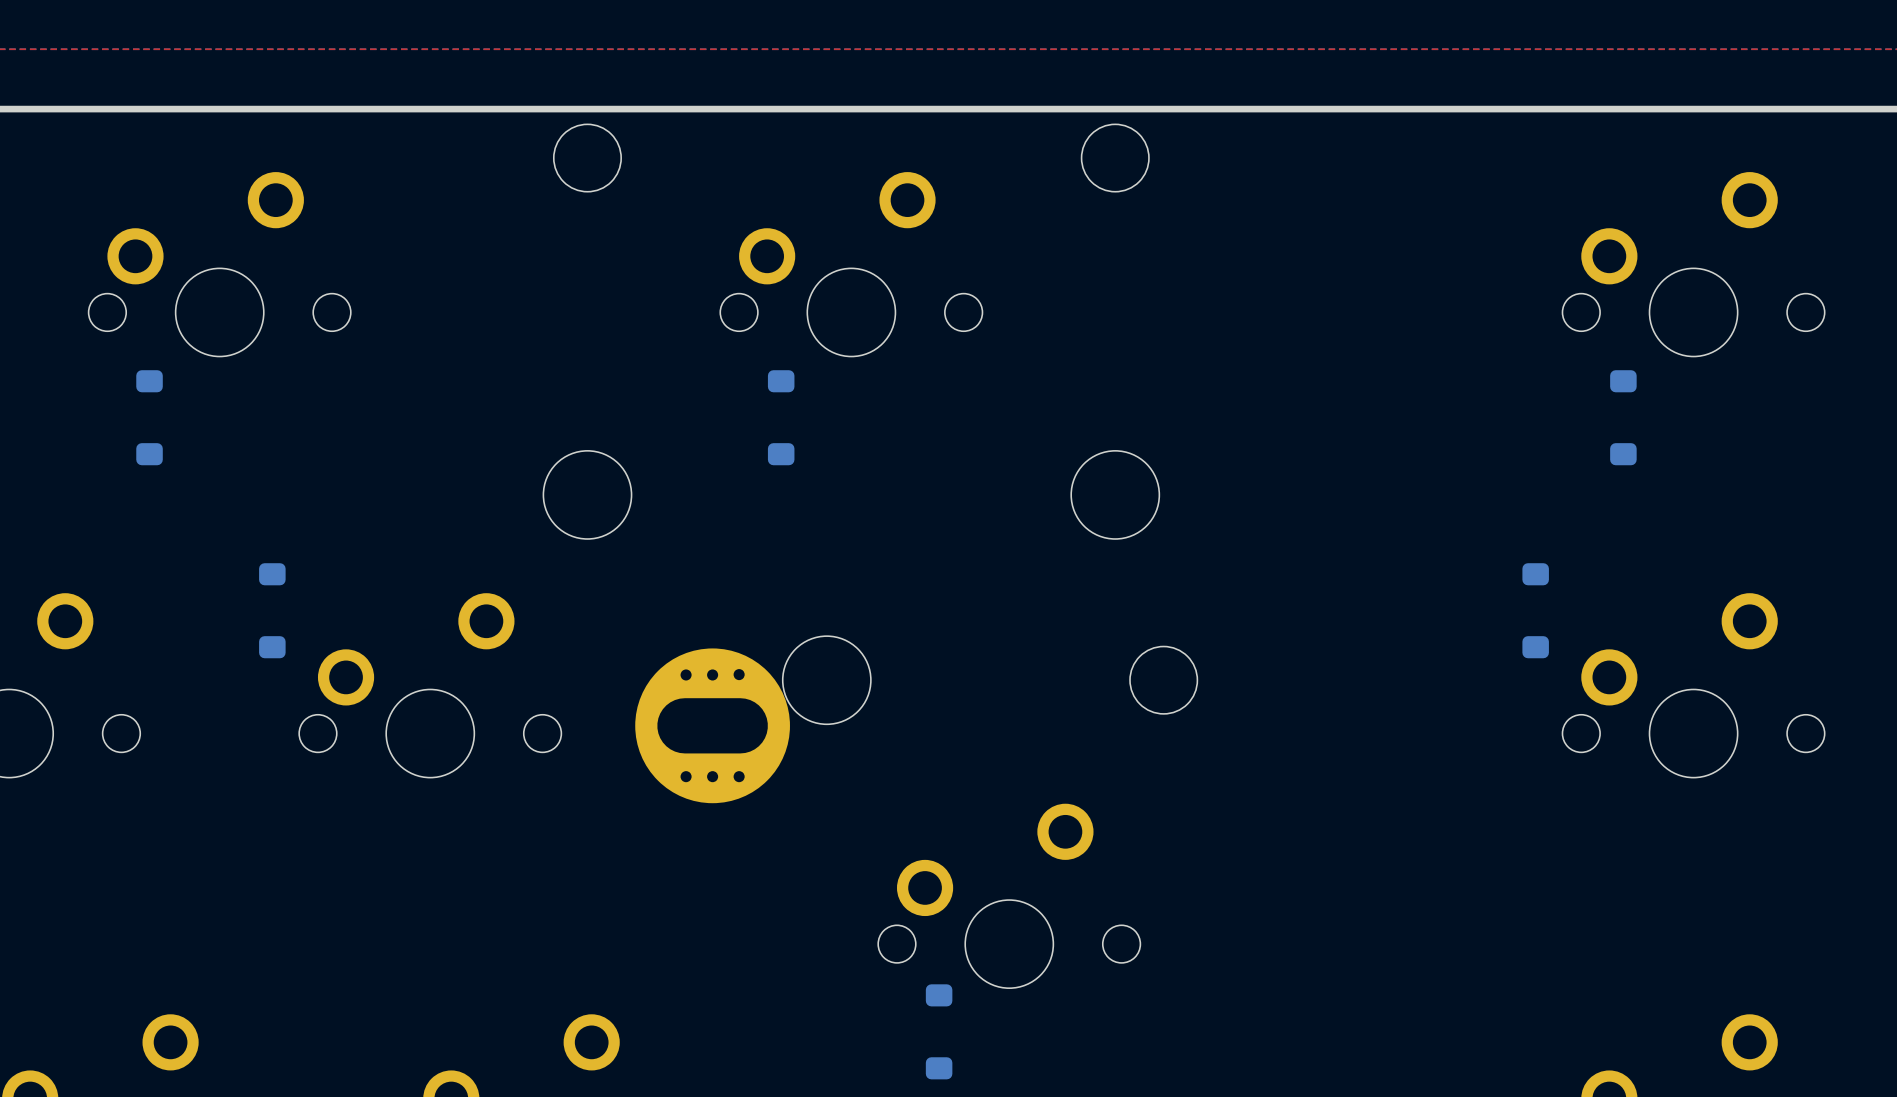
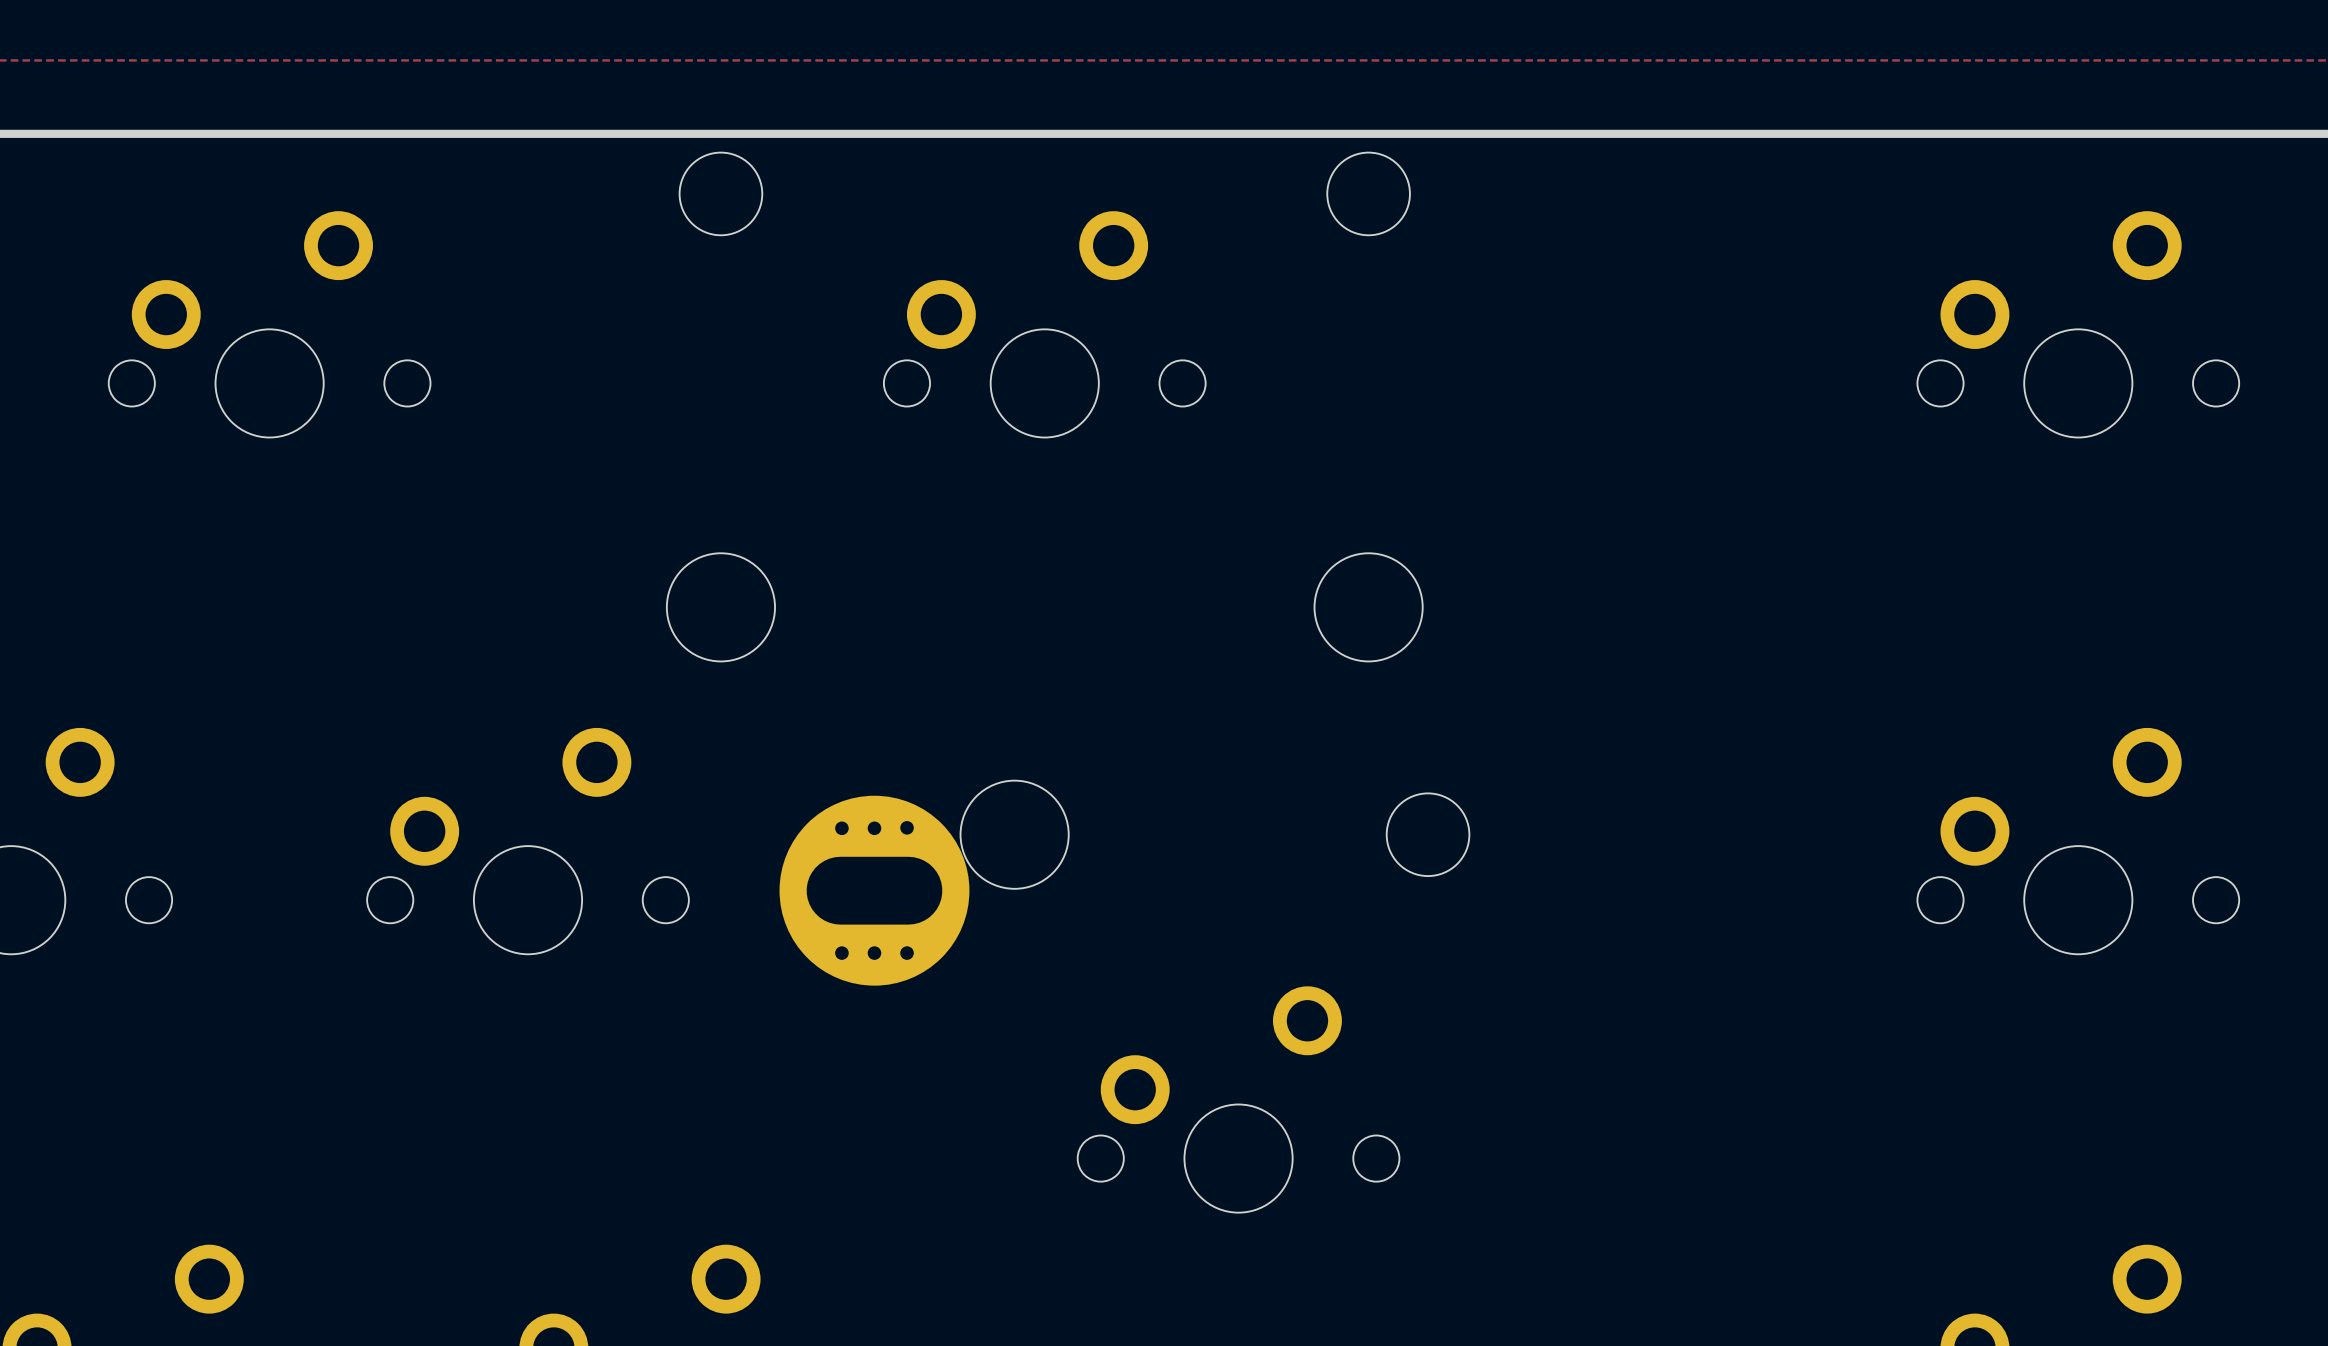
part: (149, 417) -> none
part: (781, 417) -> none
part: (1623, 417) -> none
part: (272, 610) -> none
part: (1535, 610) -> none
part: (939, 1031) -> none

